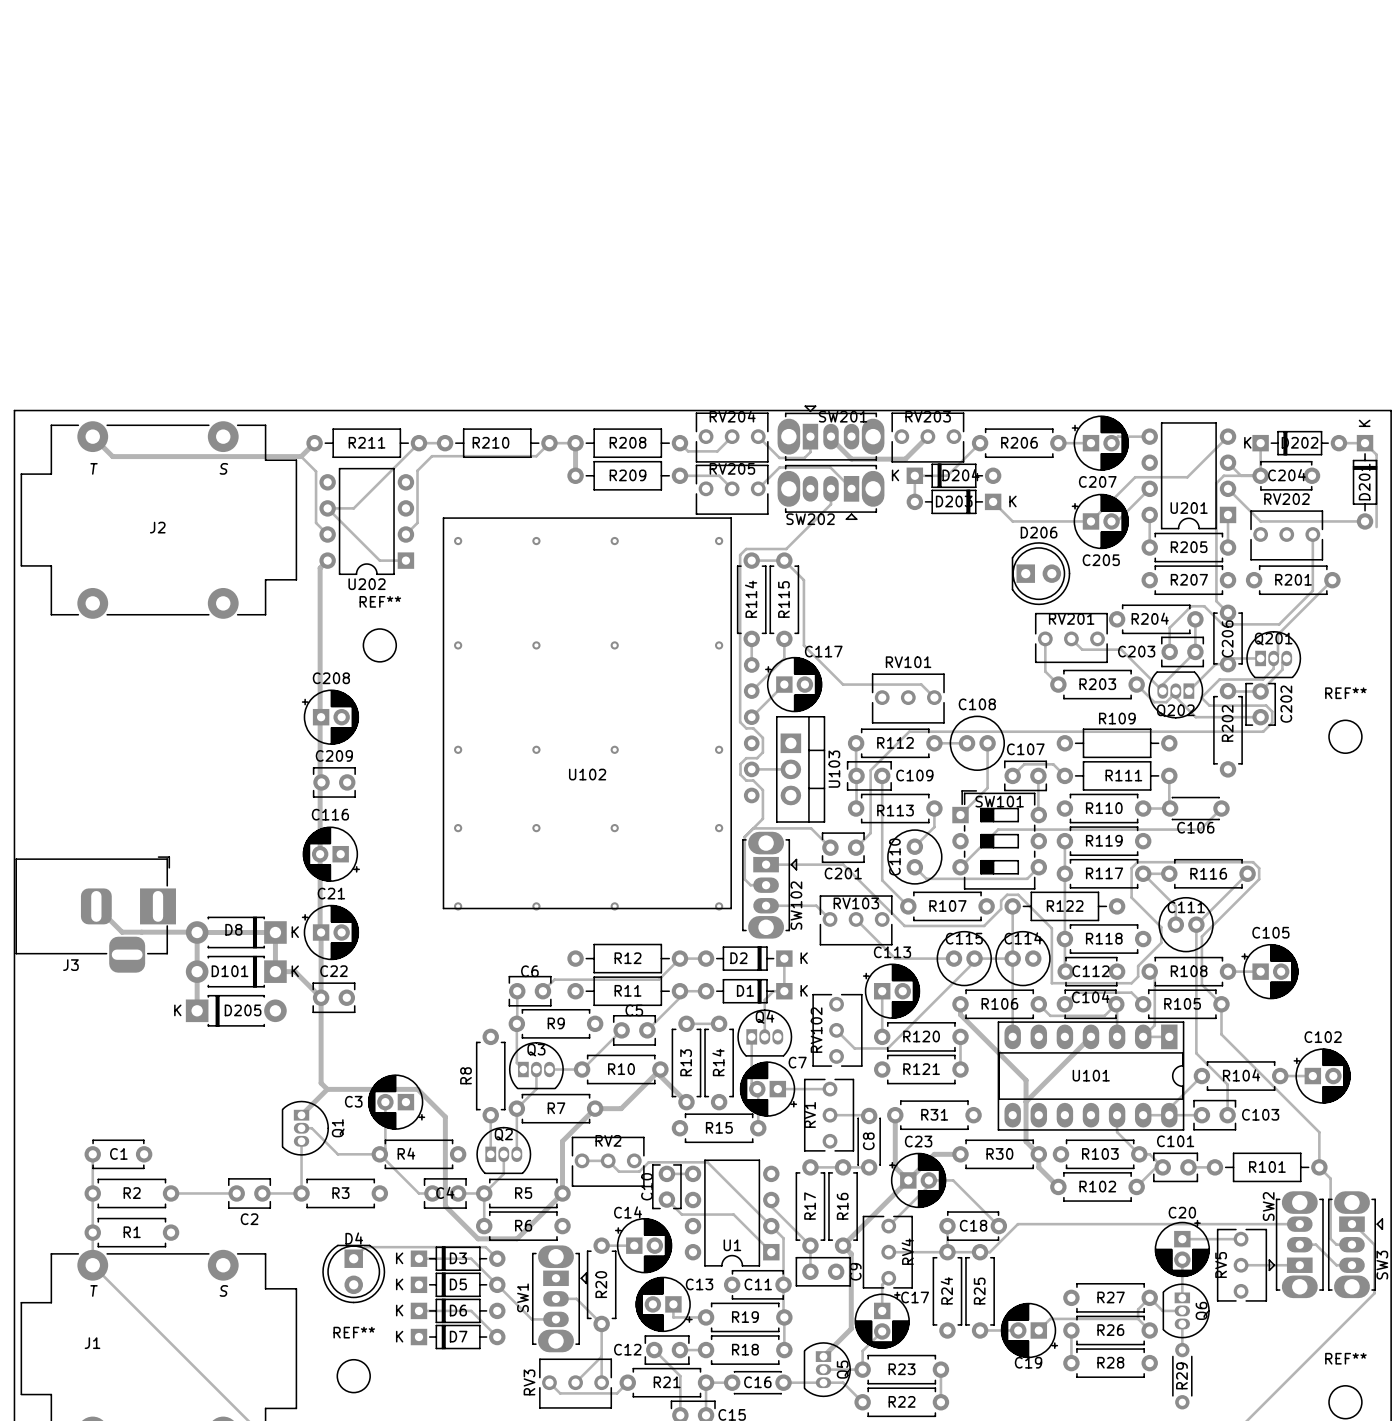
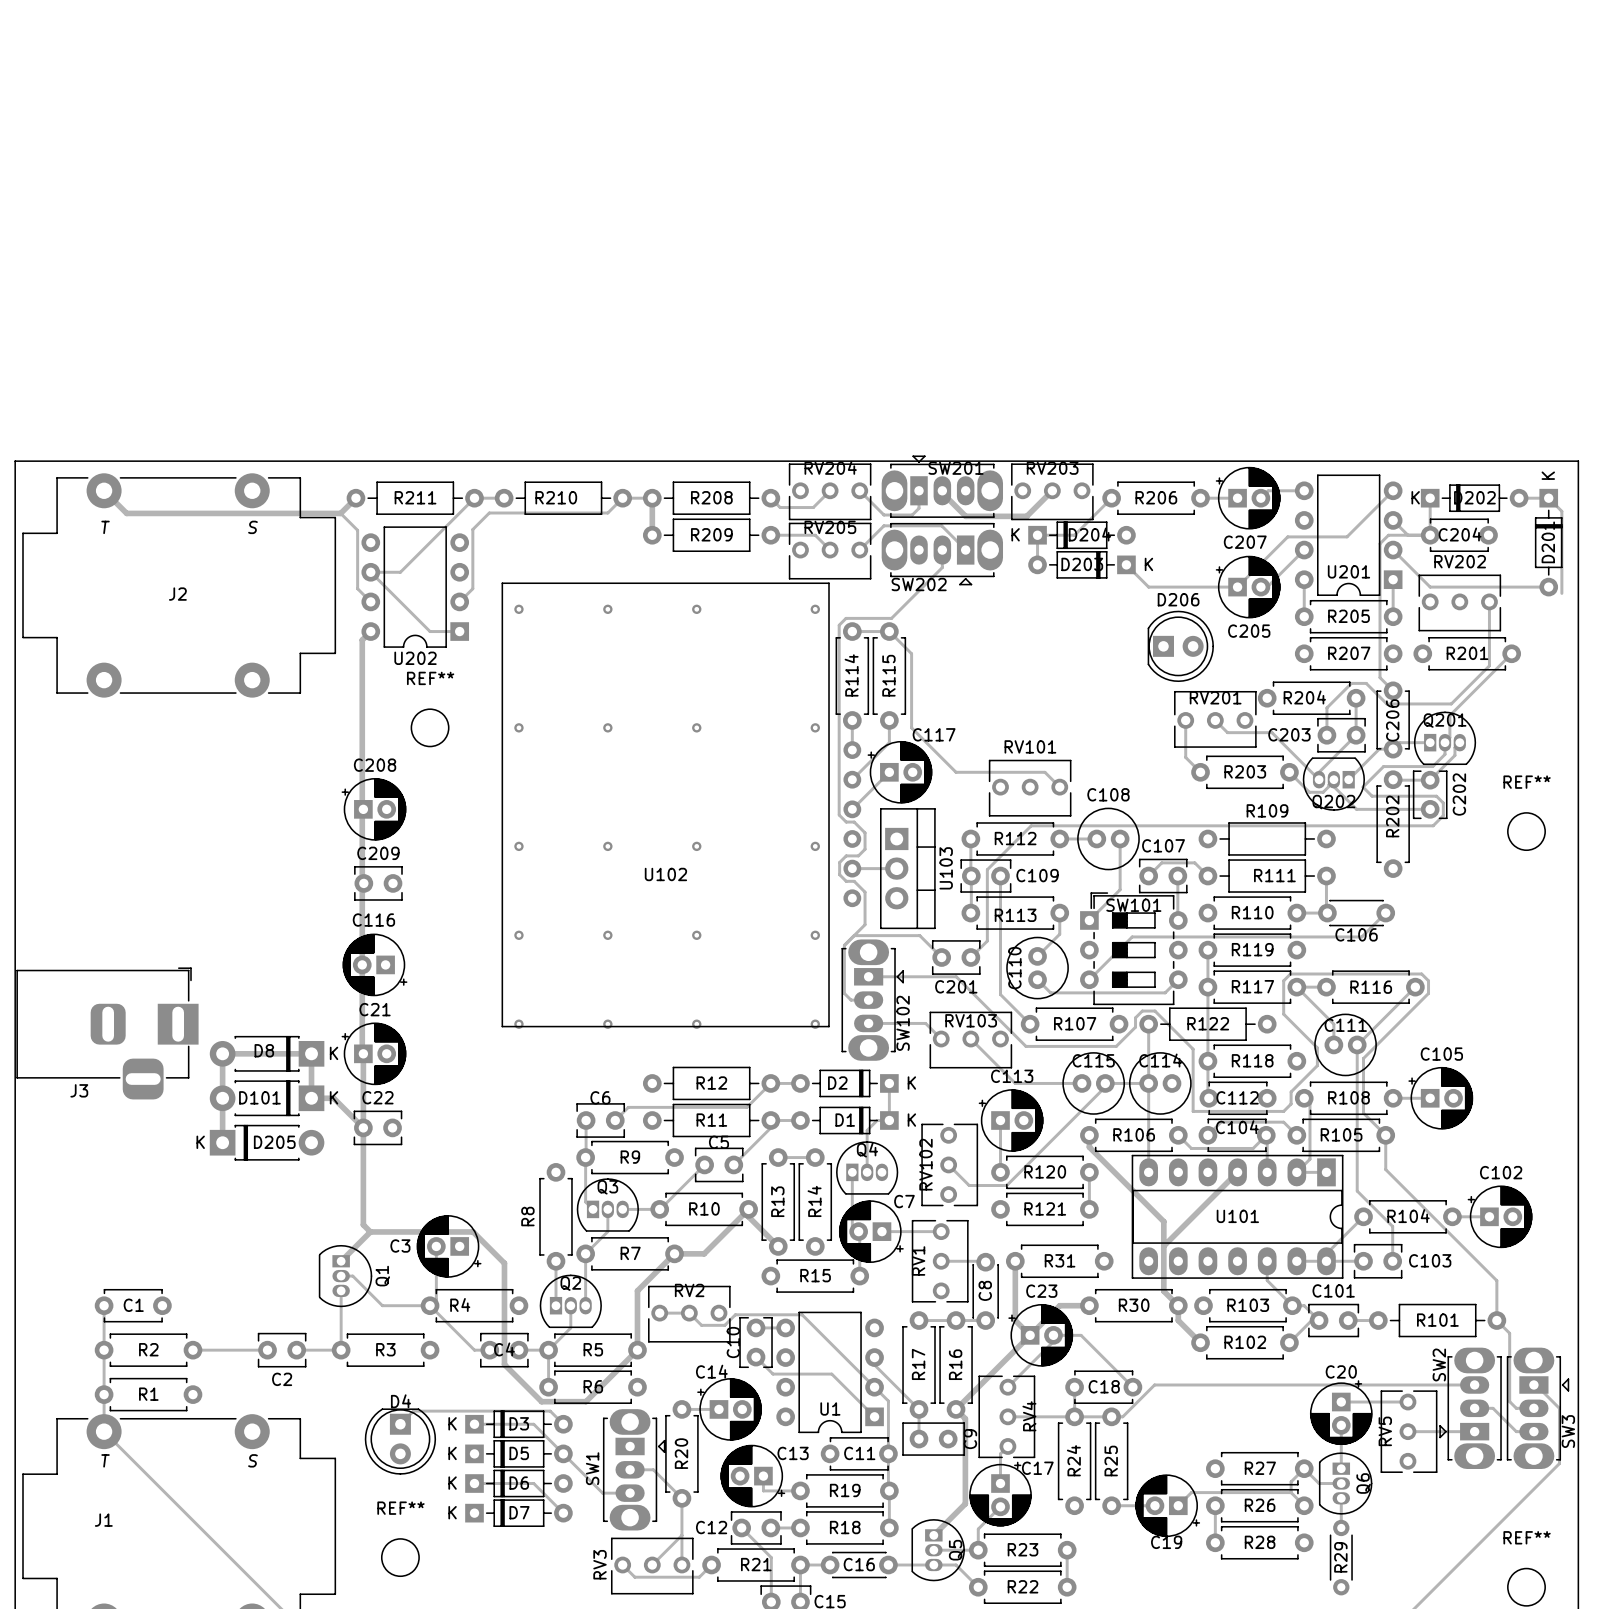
track: (96, 906) (122, 932) (196, 932) -> none

